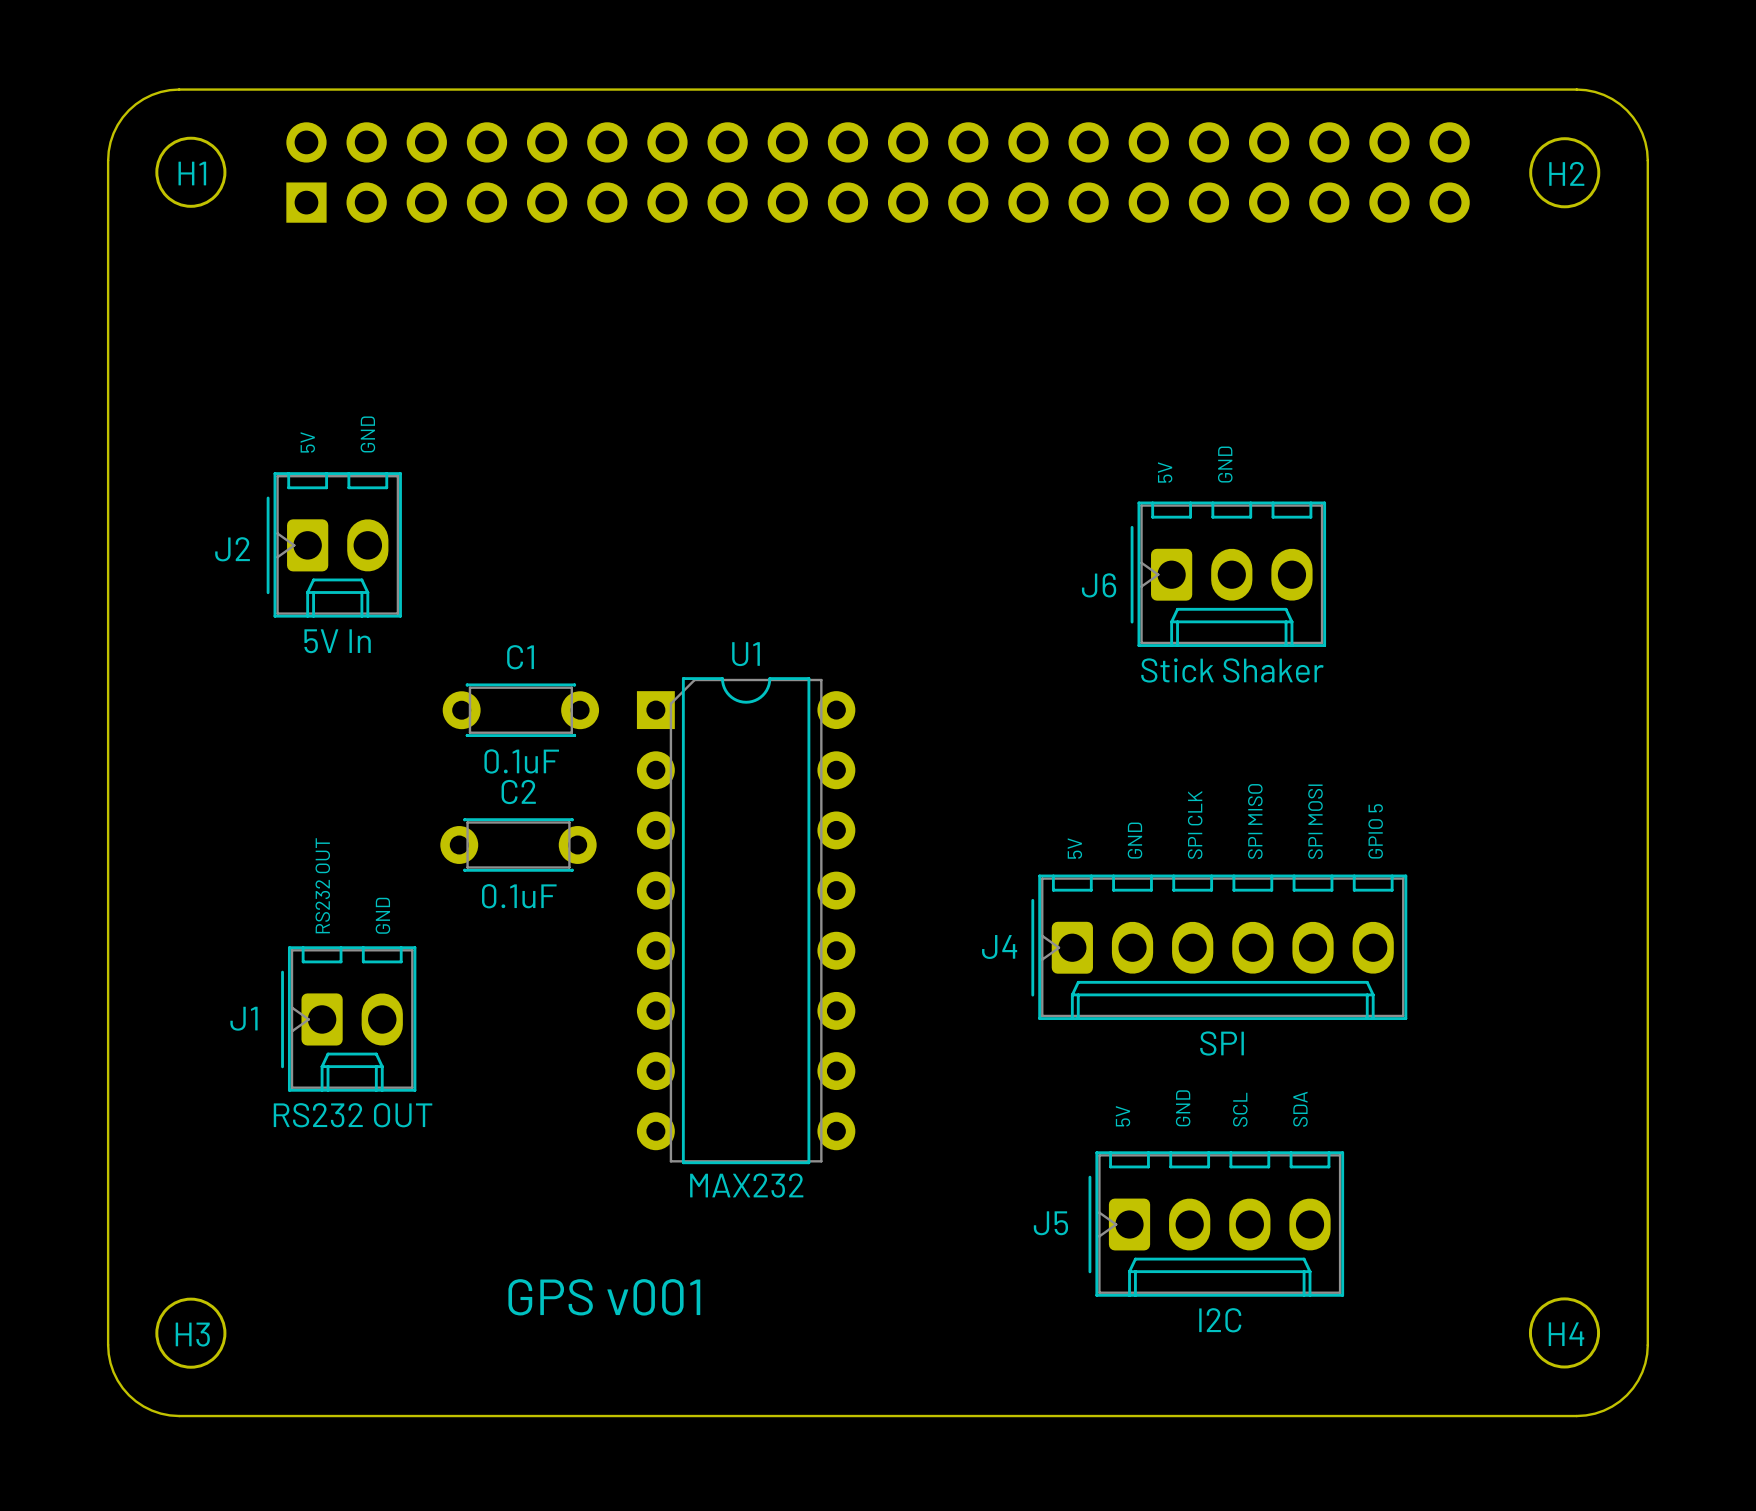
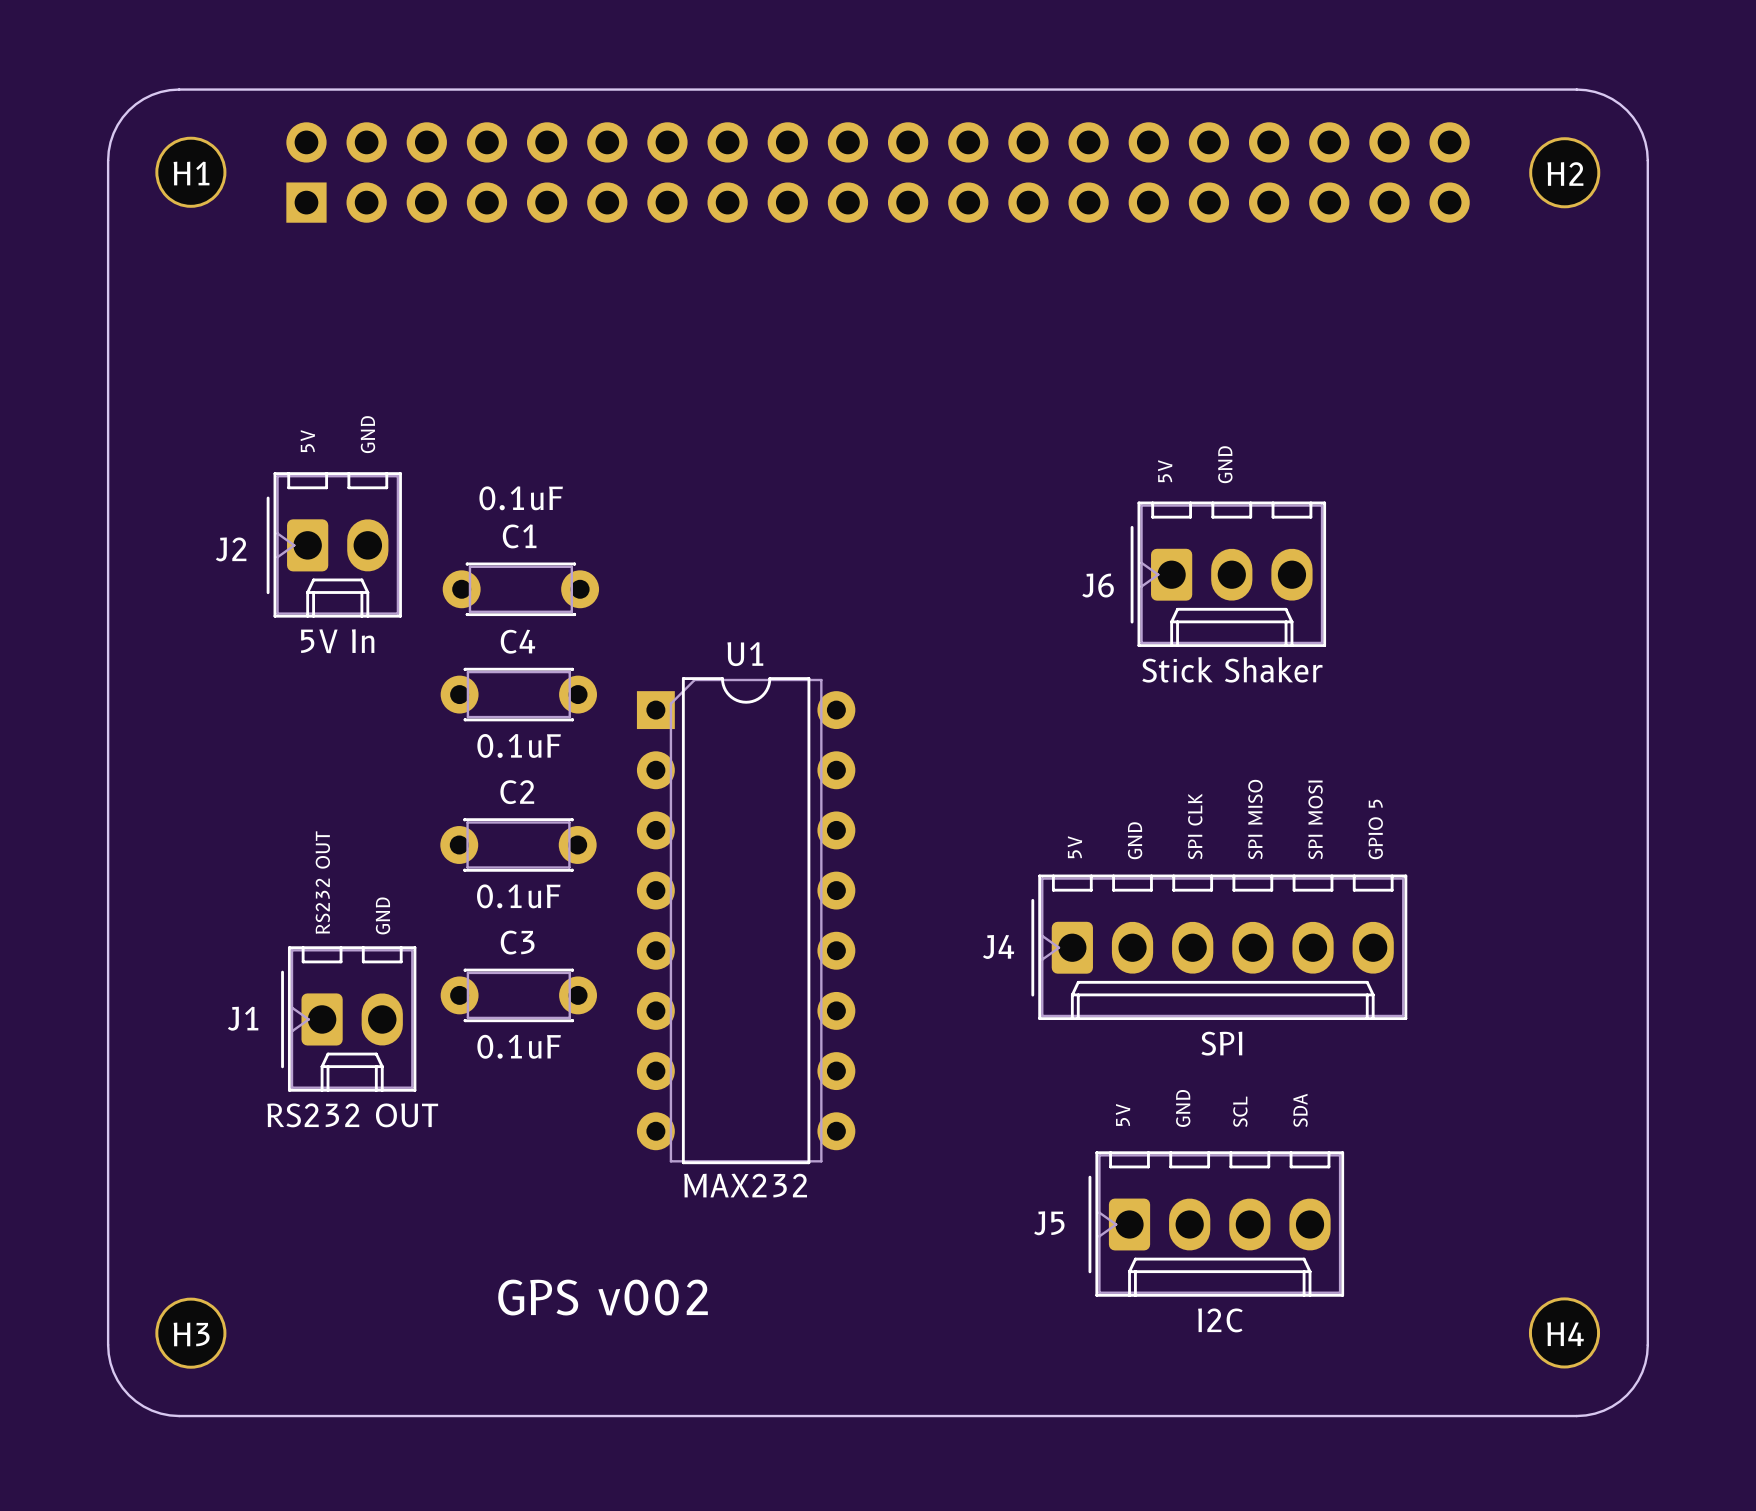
C4: none -> 0.1uF (518, 694)
C1 position: (520, 710) -> (520, 589)
C1 value position: 0.1uF (521, 761) -> 0.1uF (521, 498)
C3: none -> 0.1uF (518, 995)
text: GPS v001 (604, 1297) -> GPS v002 (603, 1297)

